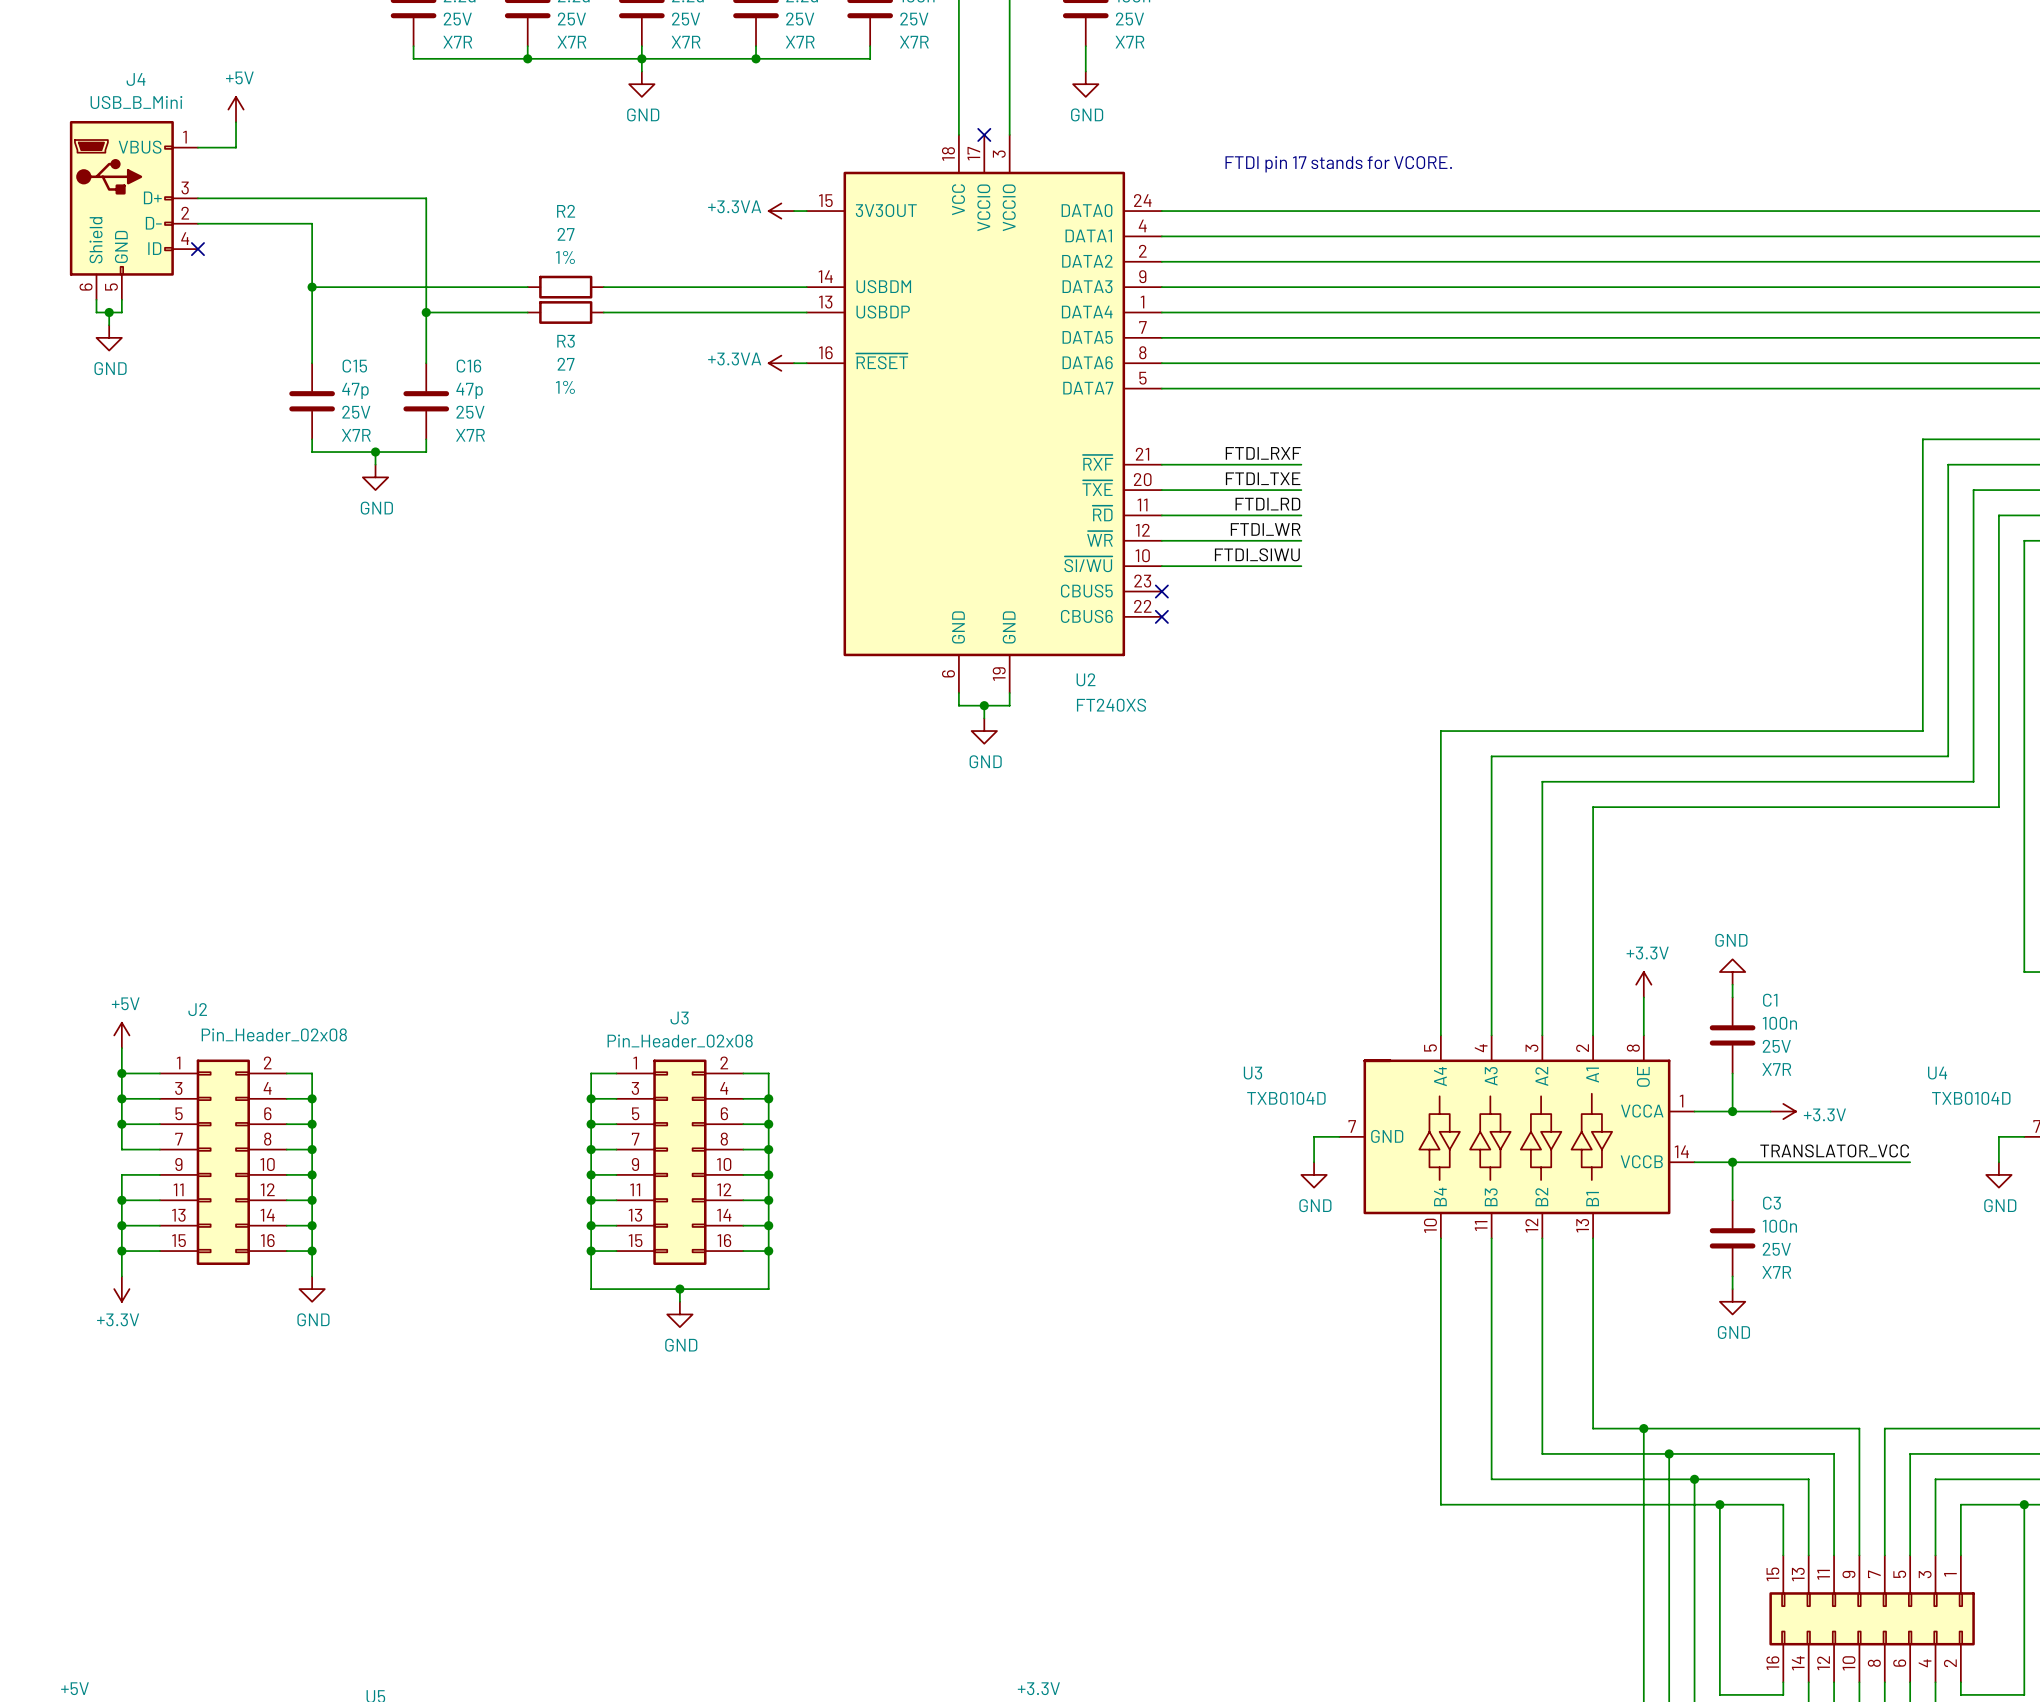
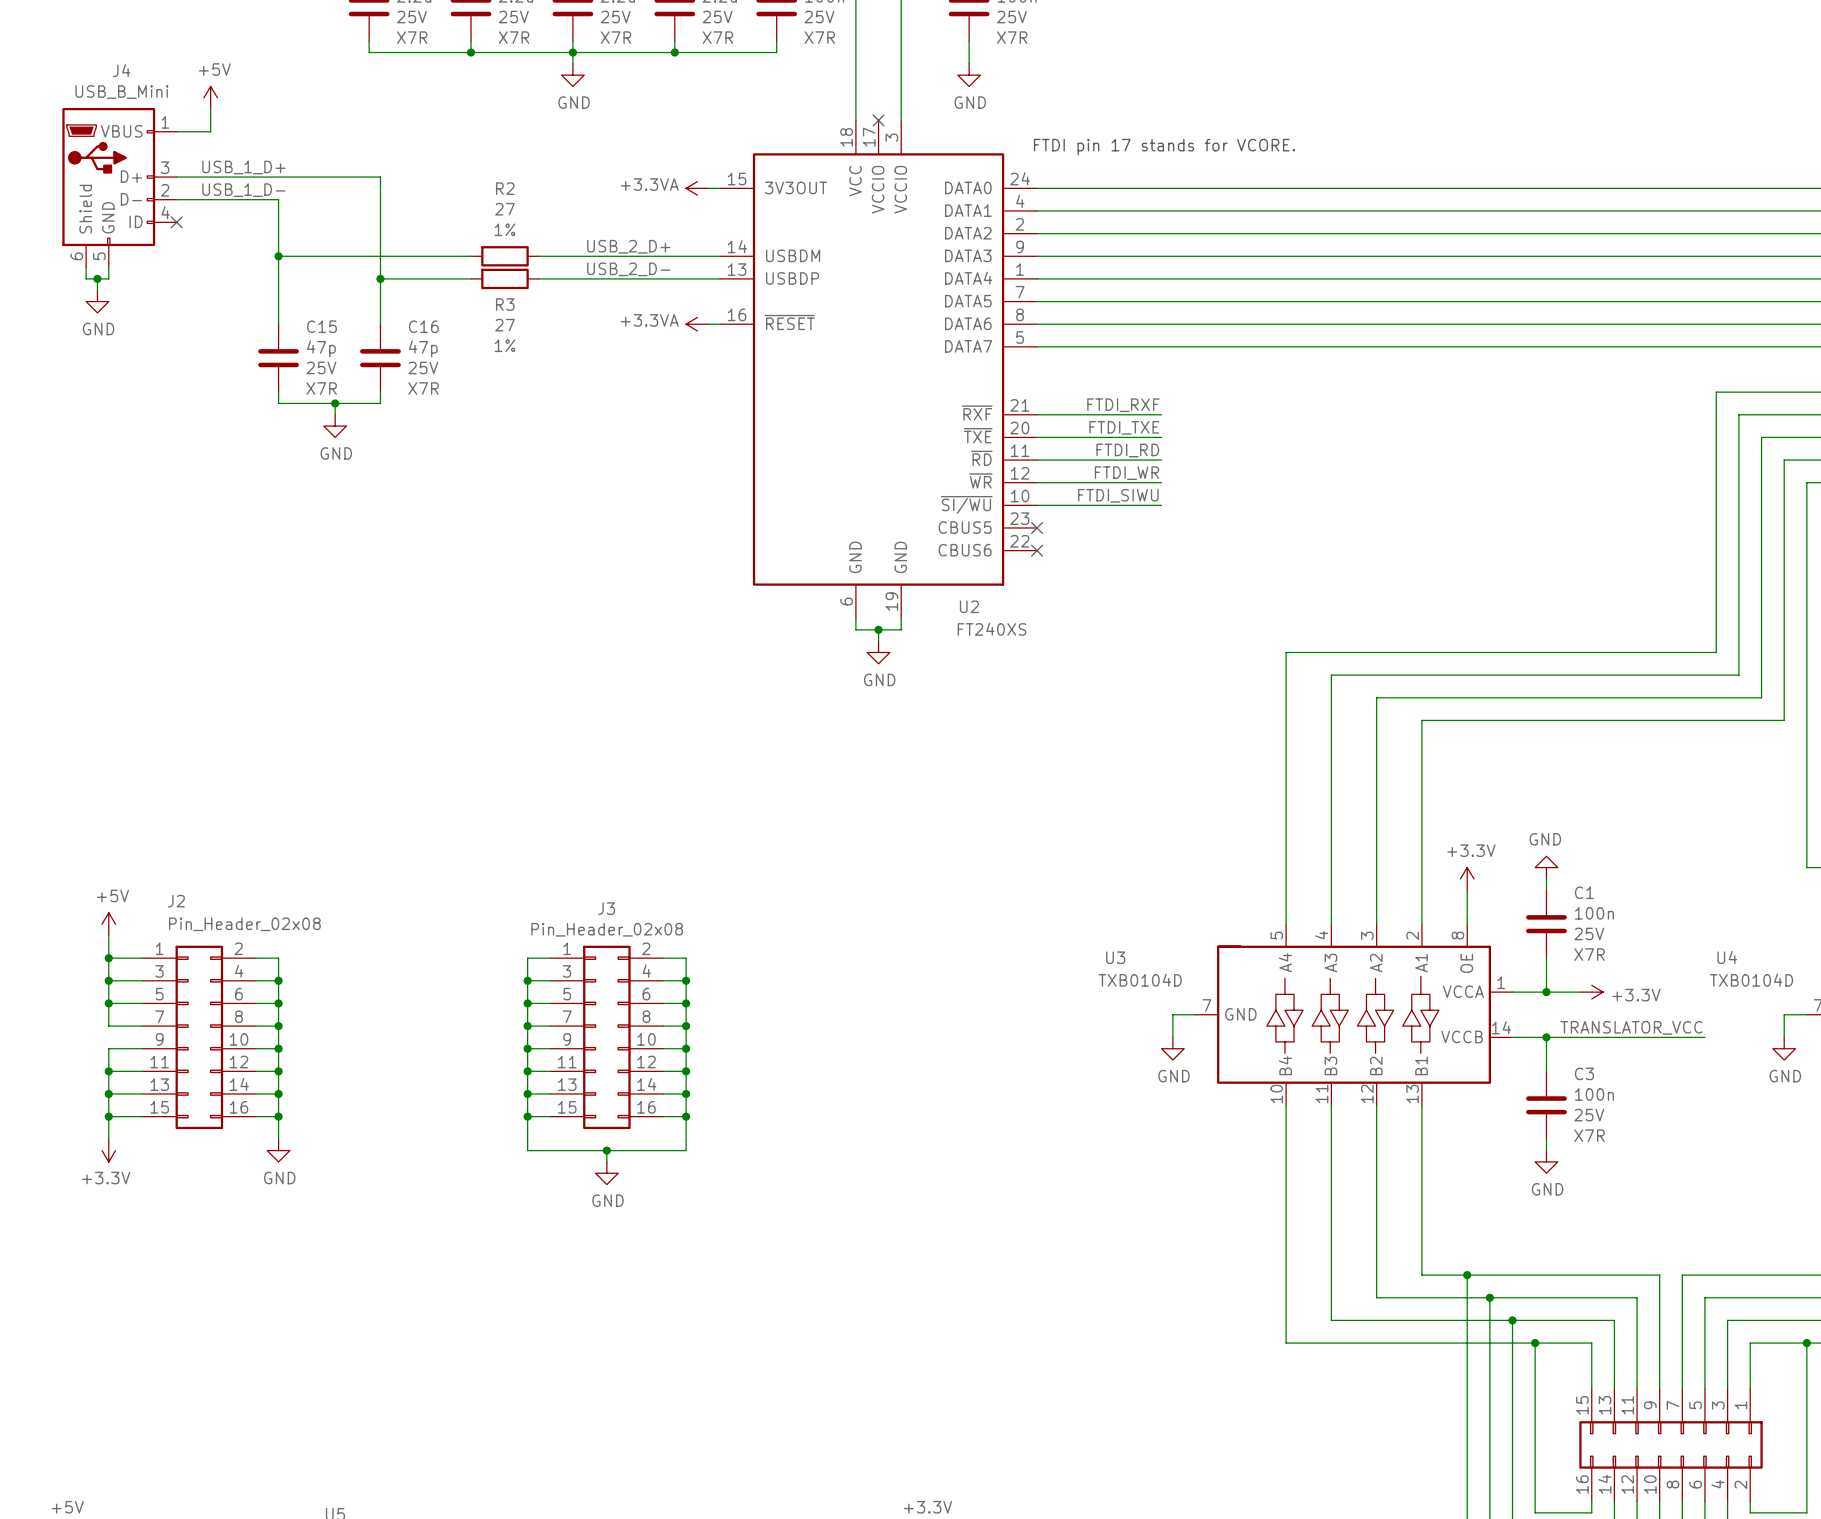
label: none -> USB_1_D+ (243, 167)
label: none -> USB_1_D- (243, 190)
label: none -> USB_2_D+ (628, 246)
label: none -> USB_2_D- (628, 269)

